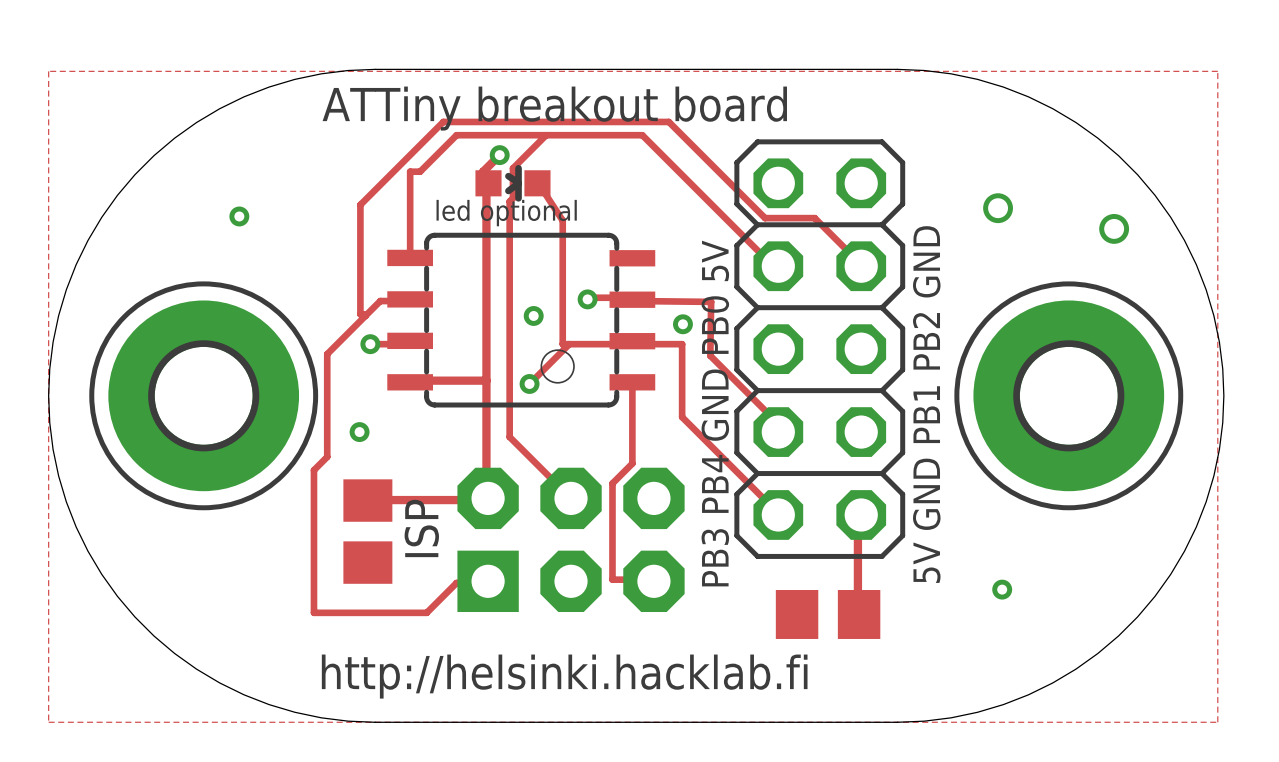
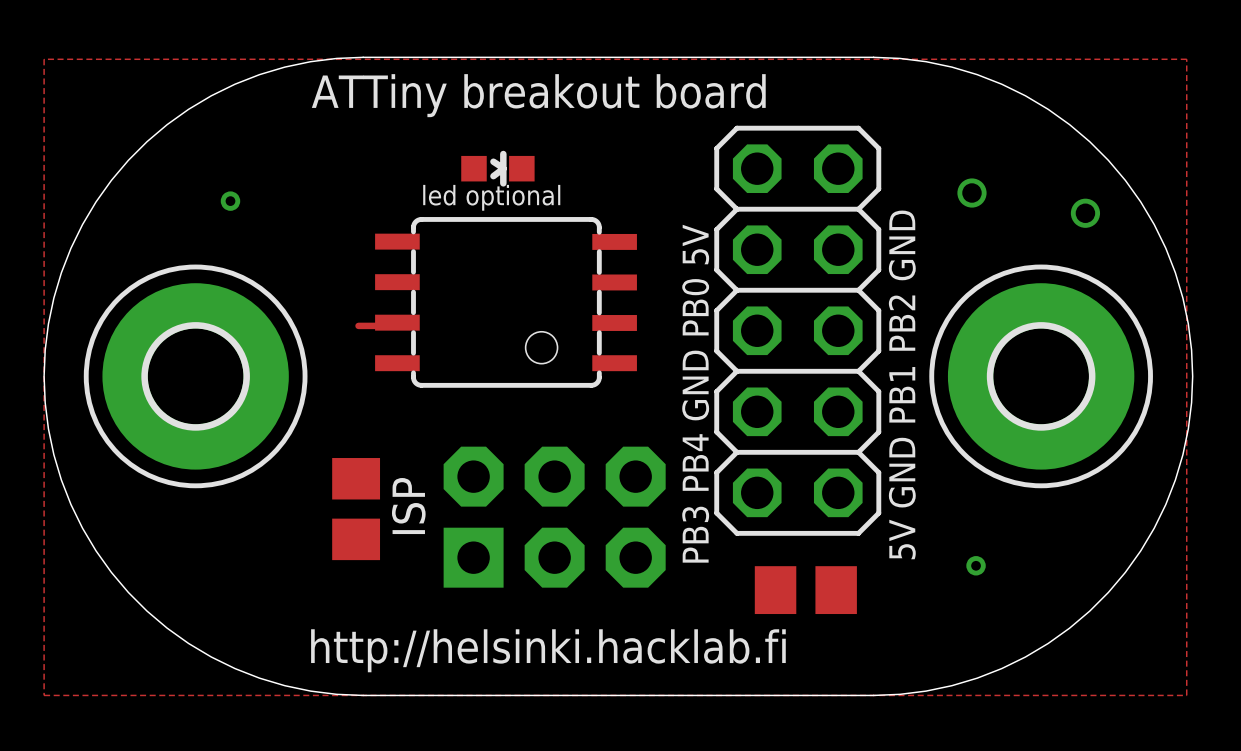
track: (546, 135) (512, 168) (512, 198) (509, 201) (509, 437) (571, 498) -> none
track: (499, 155) (483, 171) (483, 181) (488, 183) (486, 184) (486, 496) (488, 498) (486, 500) (367, 500) -> none
via: (499, 155) -> none
track: (537, 183) (562, 220) (562, 344) (632, 344) (632, 341) (635, 344) (682, 344) (682, 417) (778, 514) -> none
track: (410, 257) (410, 171) (420, 171) (456, 135) (642, 135) (771, 264) (778, 264) (778, 266) -> none
track: (861, 266) (814, 218) (765, 218) (668, 121) (443, 121) (360, 204) (360, 314) (365, 315) -> none
track: (410, 299) (380, 301) (327, 354) (327, 456) (313, 470) (313, 612) (426, 612) (456, 582) (486, 582) (488, 581) -> none
track: (587, 299) (589, 297) (632, 297) (635, 301) (711, 301) (710, 355) (778, 423) (778, 432) -> none
via: (587, 299) -> none
via: (533, 315) -> none
via: (682, 324) -> none
via: (370, 344) -> none
track: (569, 344) (529, 383) -> none
track: (486, 380) (410, 380) (410, 382) -> none
track: (632, 382) (632, 463) (612, 483) (612, 579) (652, 579) (653, 581) -> none
via: (529, 383) -> none
via: (359, 432) -> none
track: (861, 514) (857, 516) (859, 614) -> none

